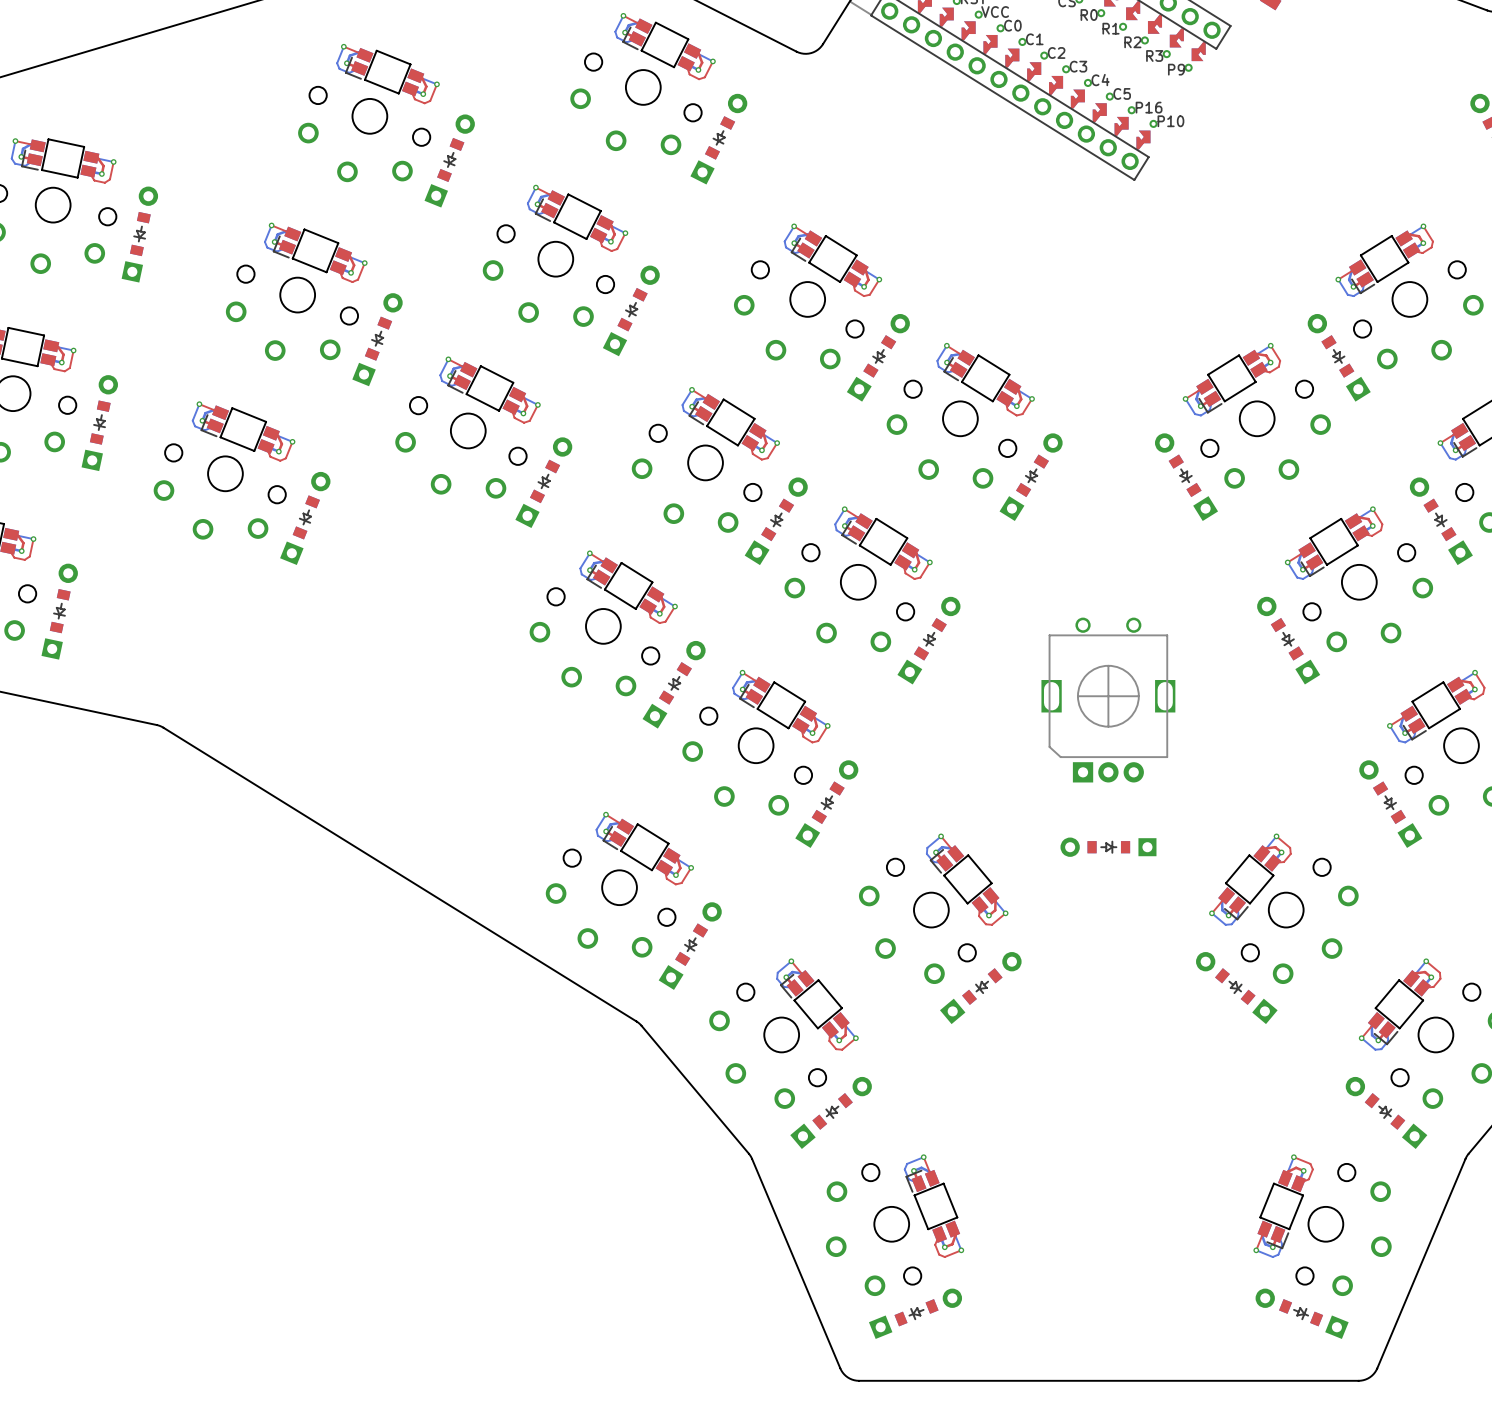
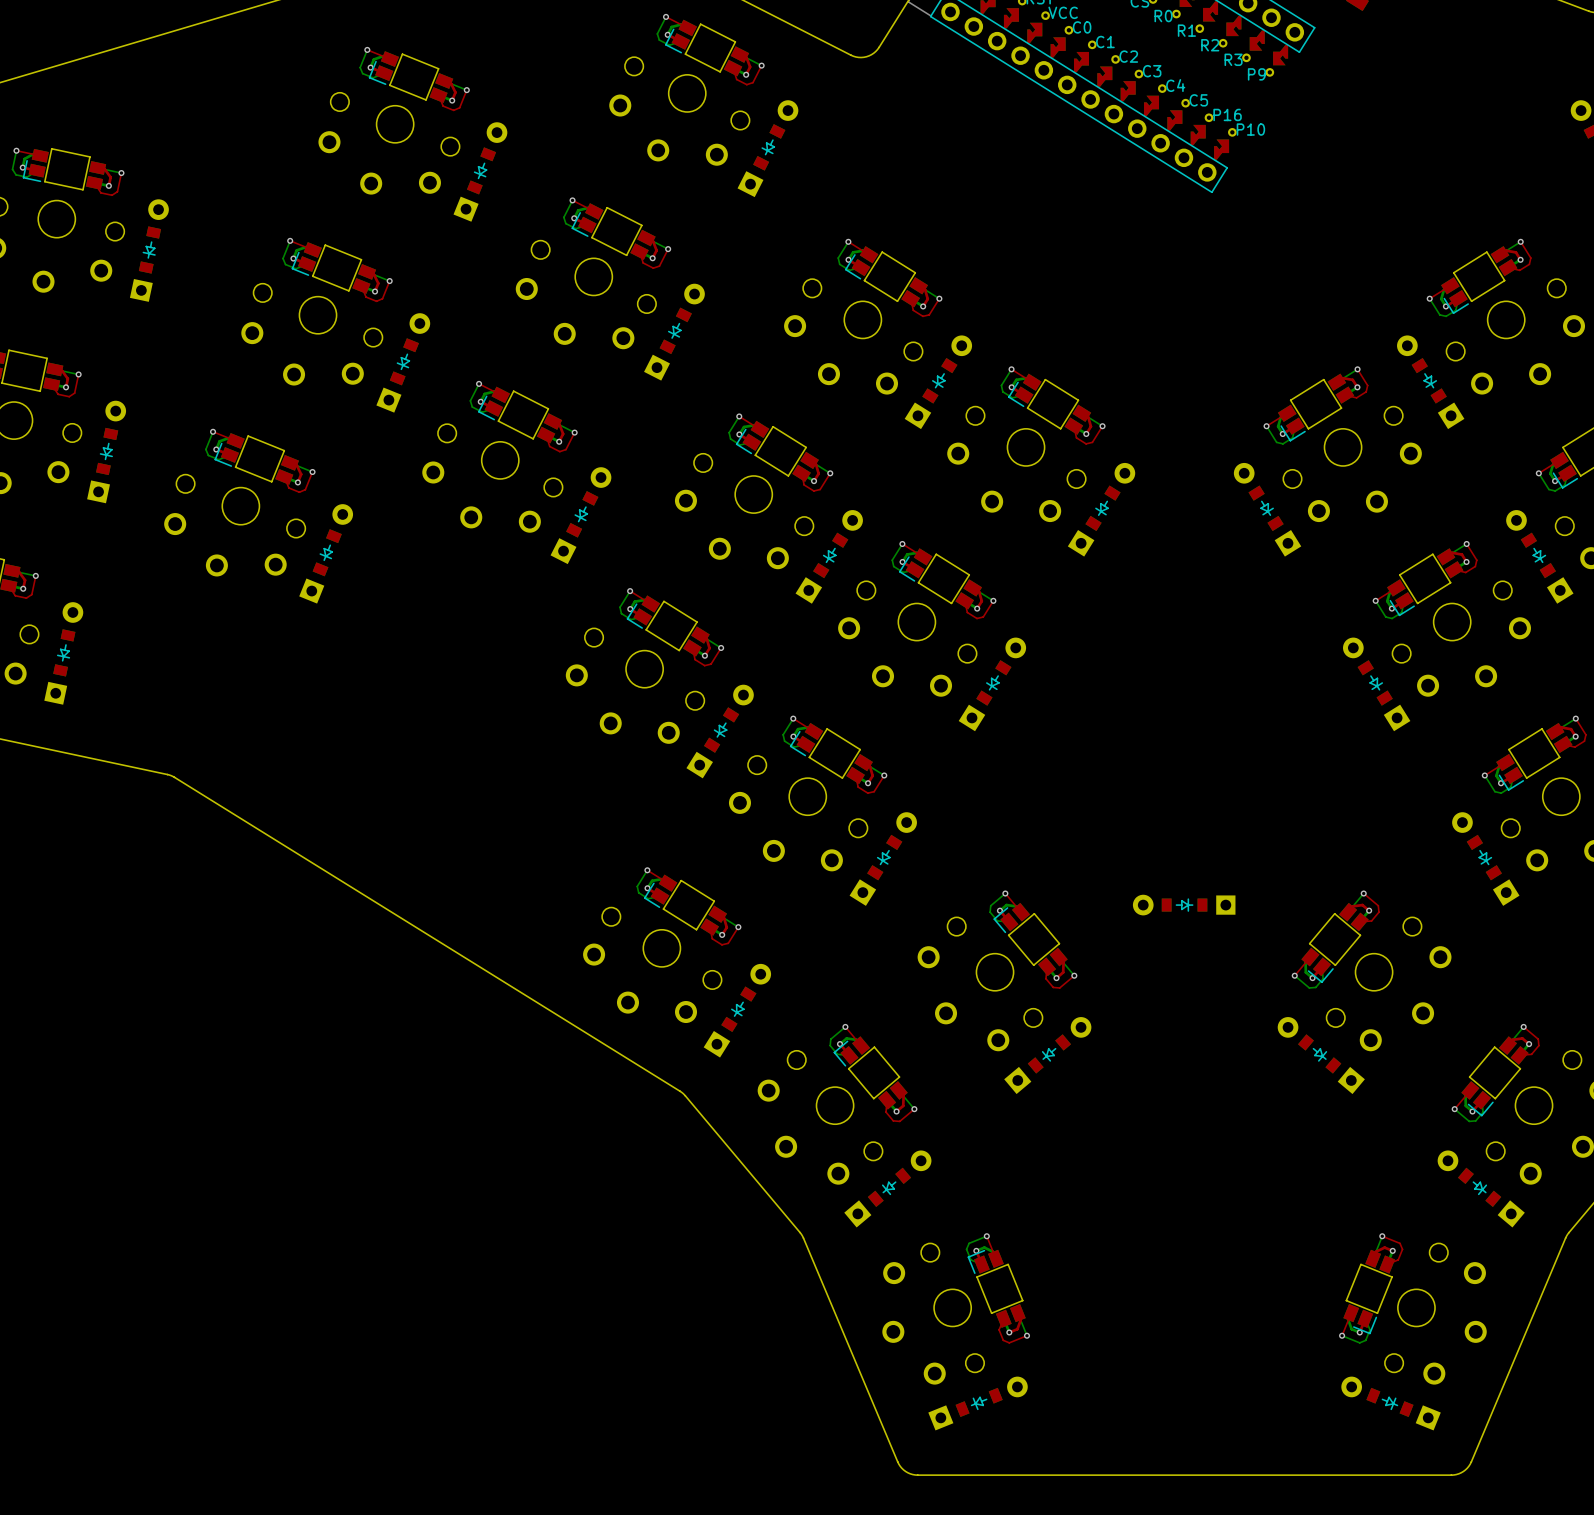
part: (1108, 700) -> none

